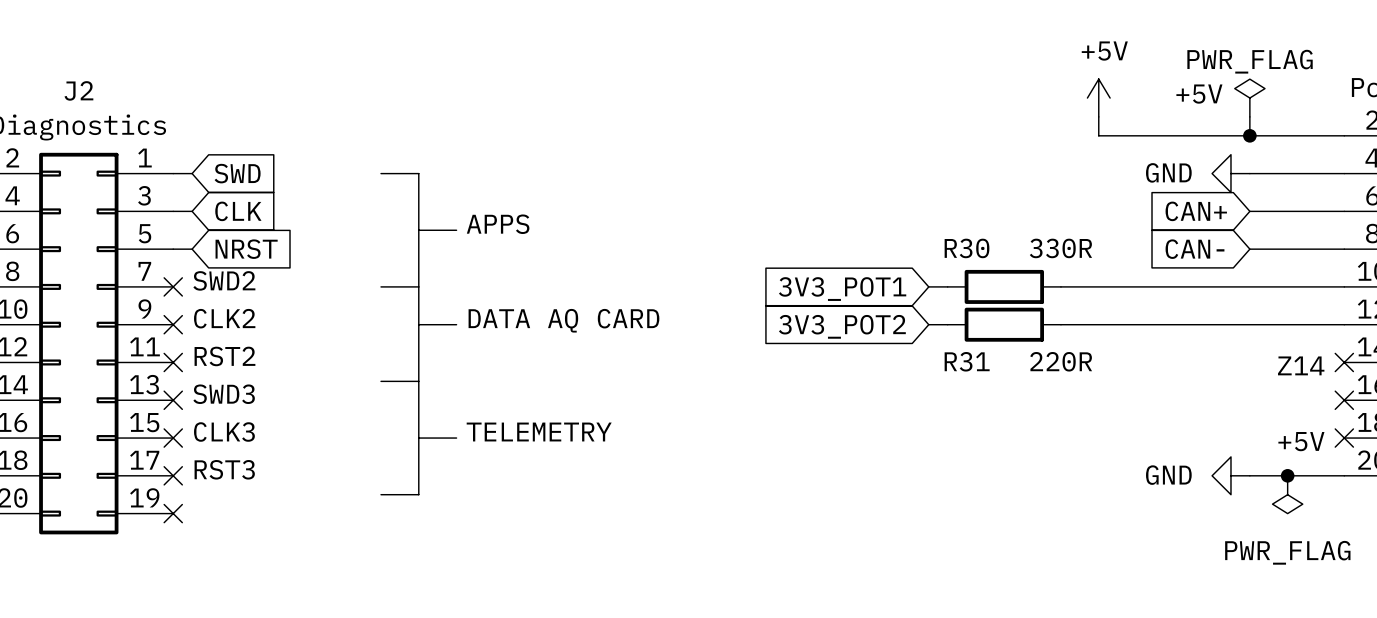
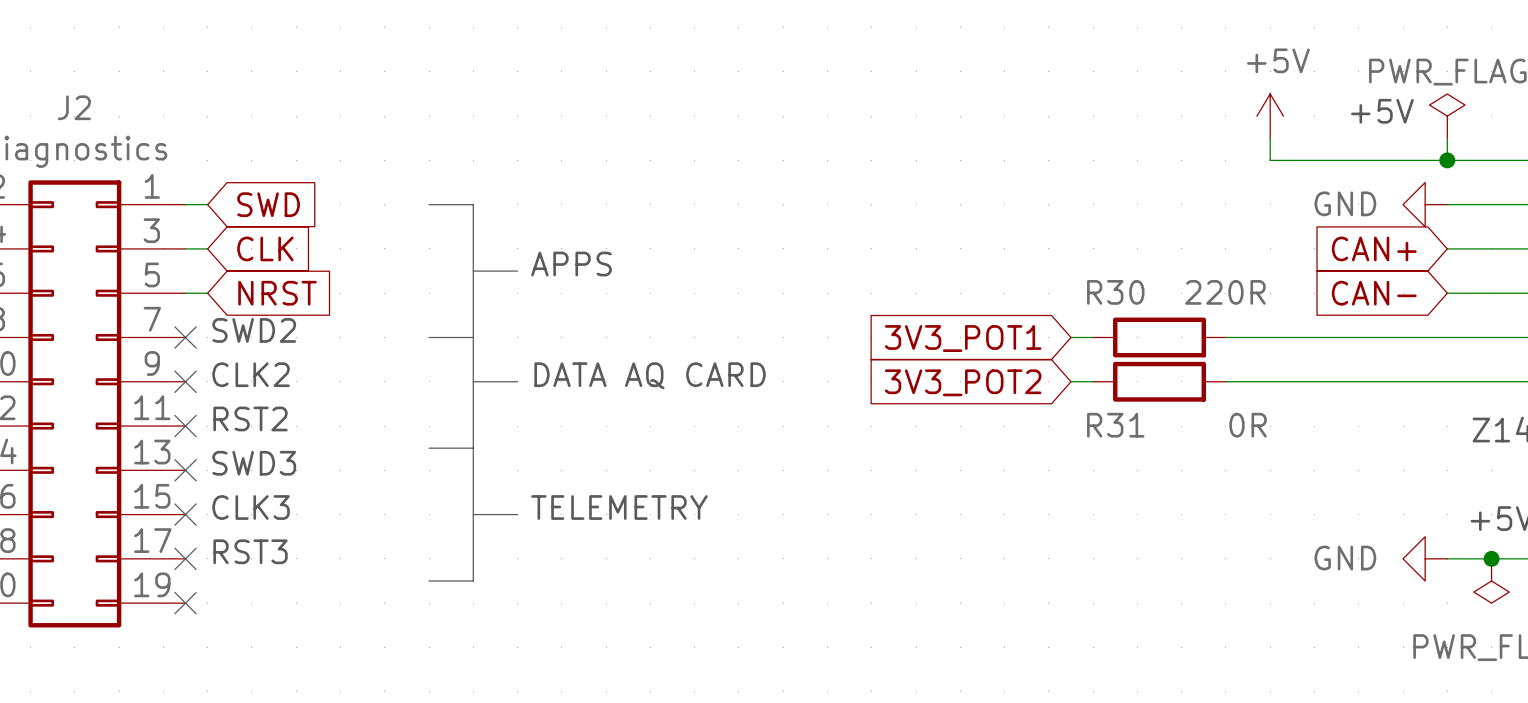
R30 value: 330R (1060, 248) -> 220R (1225, 292)
R31 value: 220R (1061, 361) -> 0R (1248, 425)

